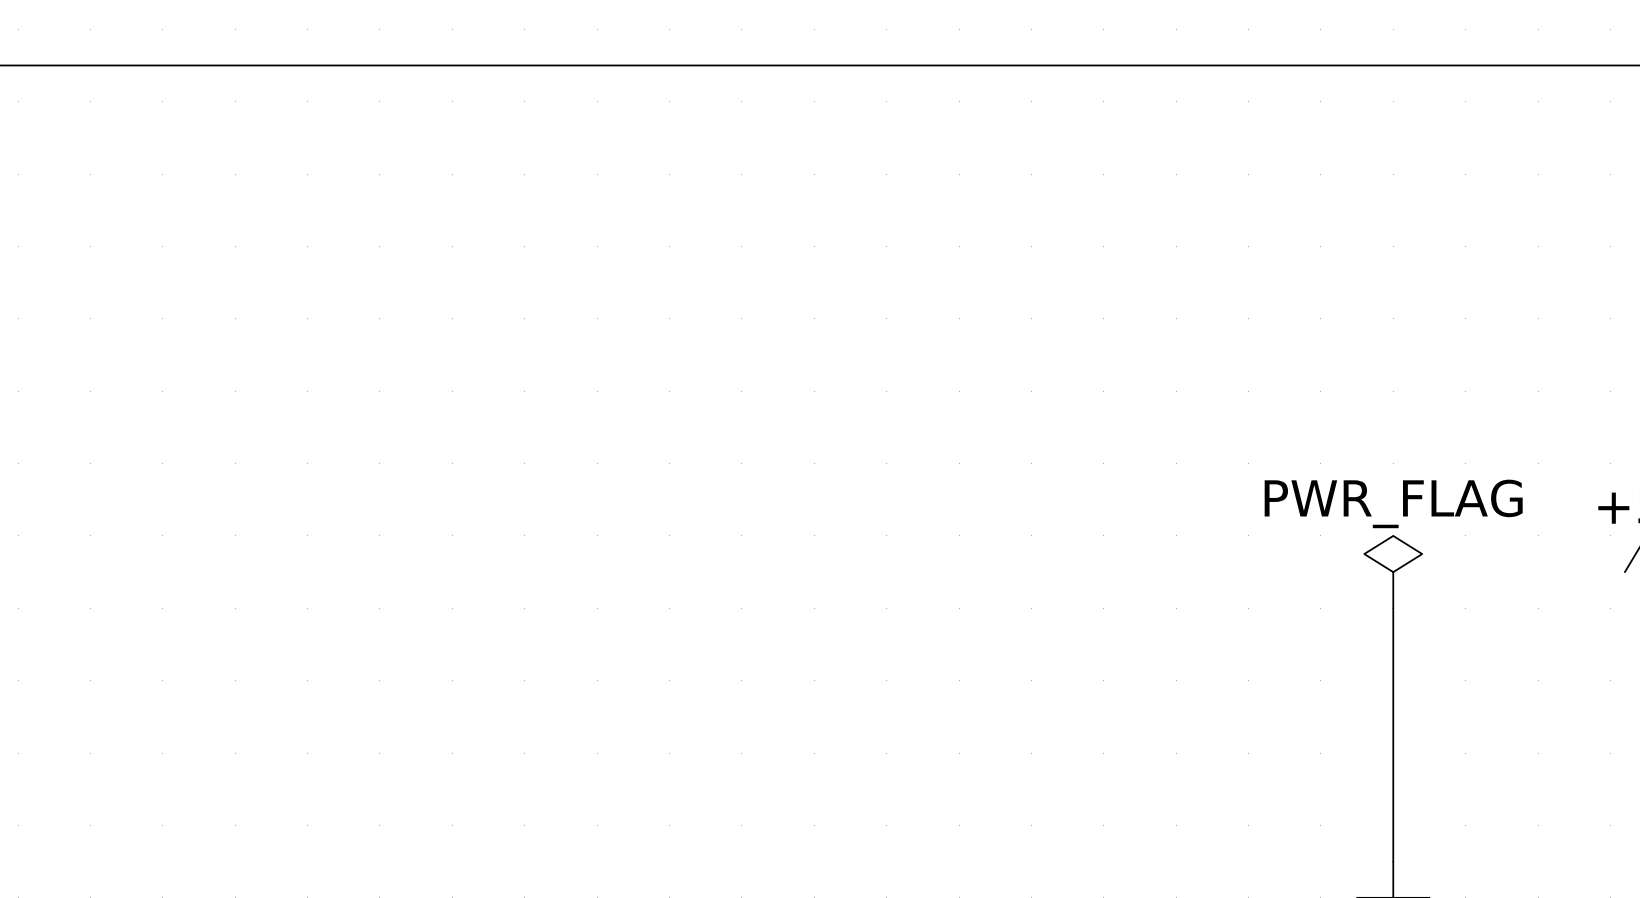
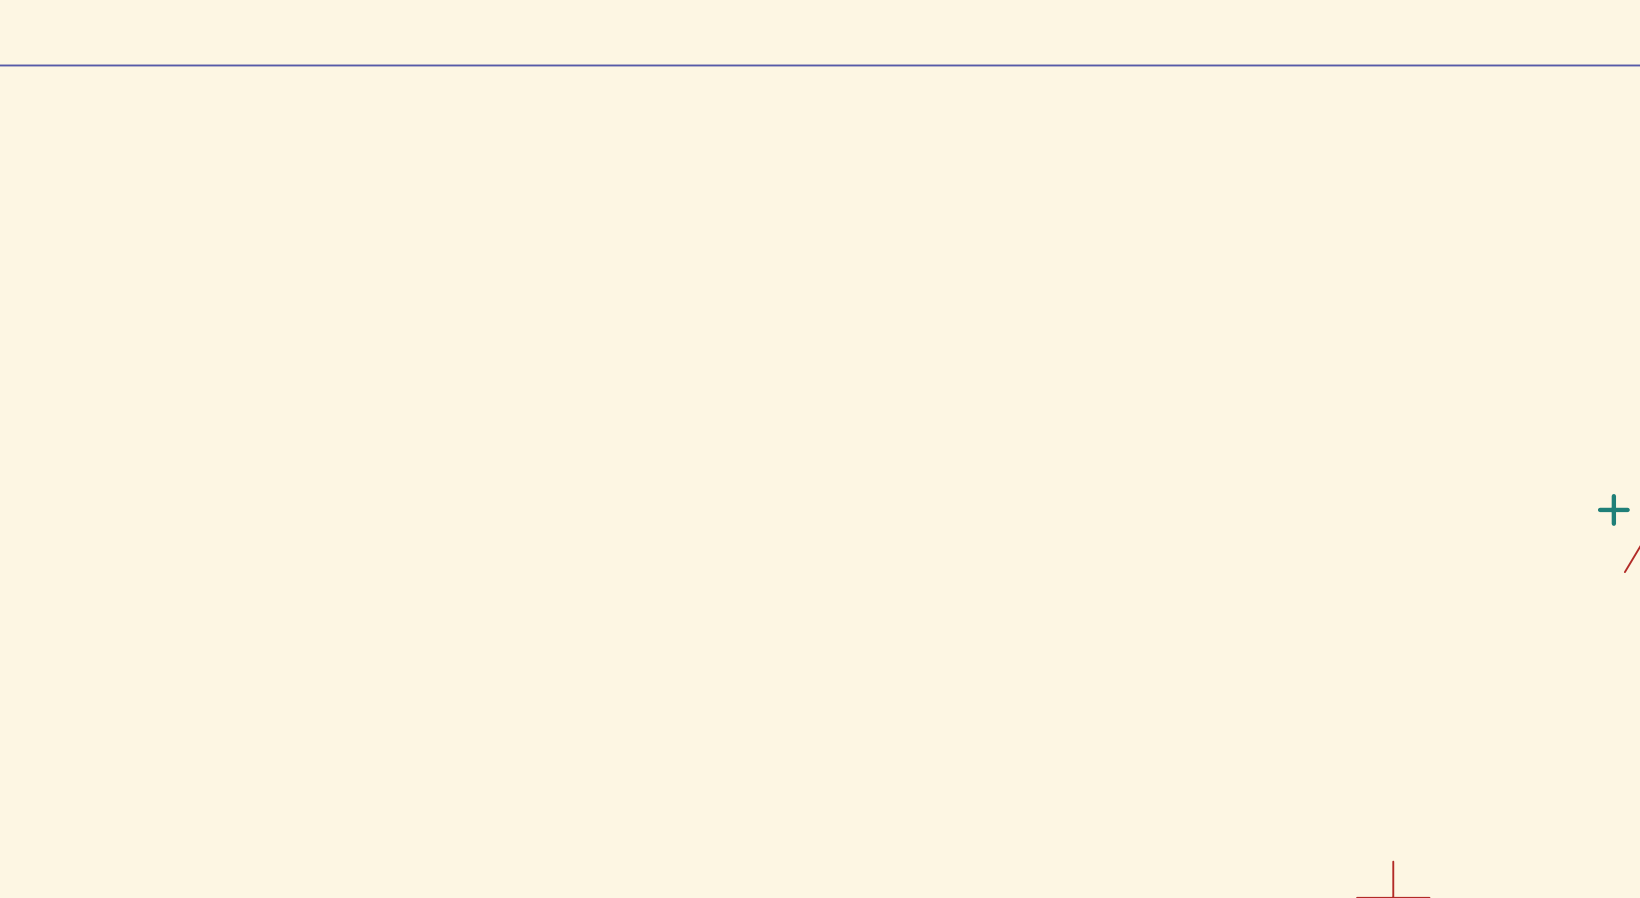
power symbol: PWR_FLAG (1393, 572) -> none
wire: (1393, 608) (1393, 861) -> none

